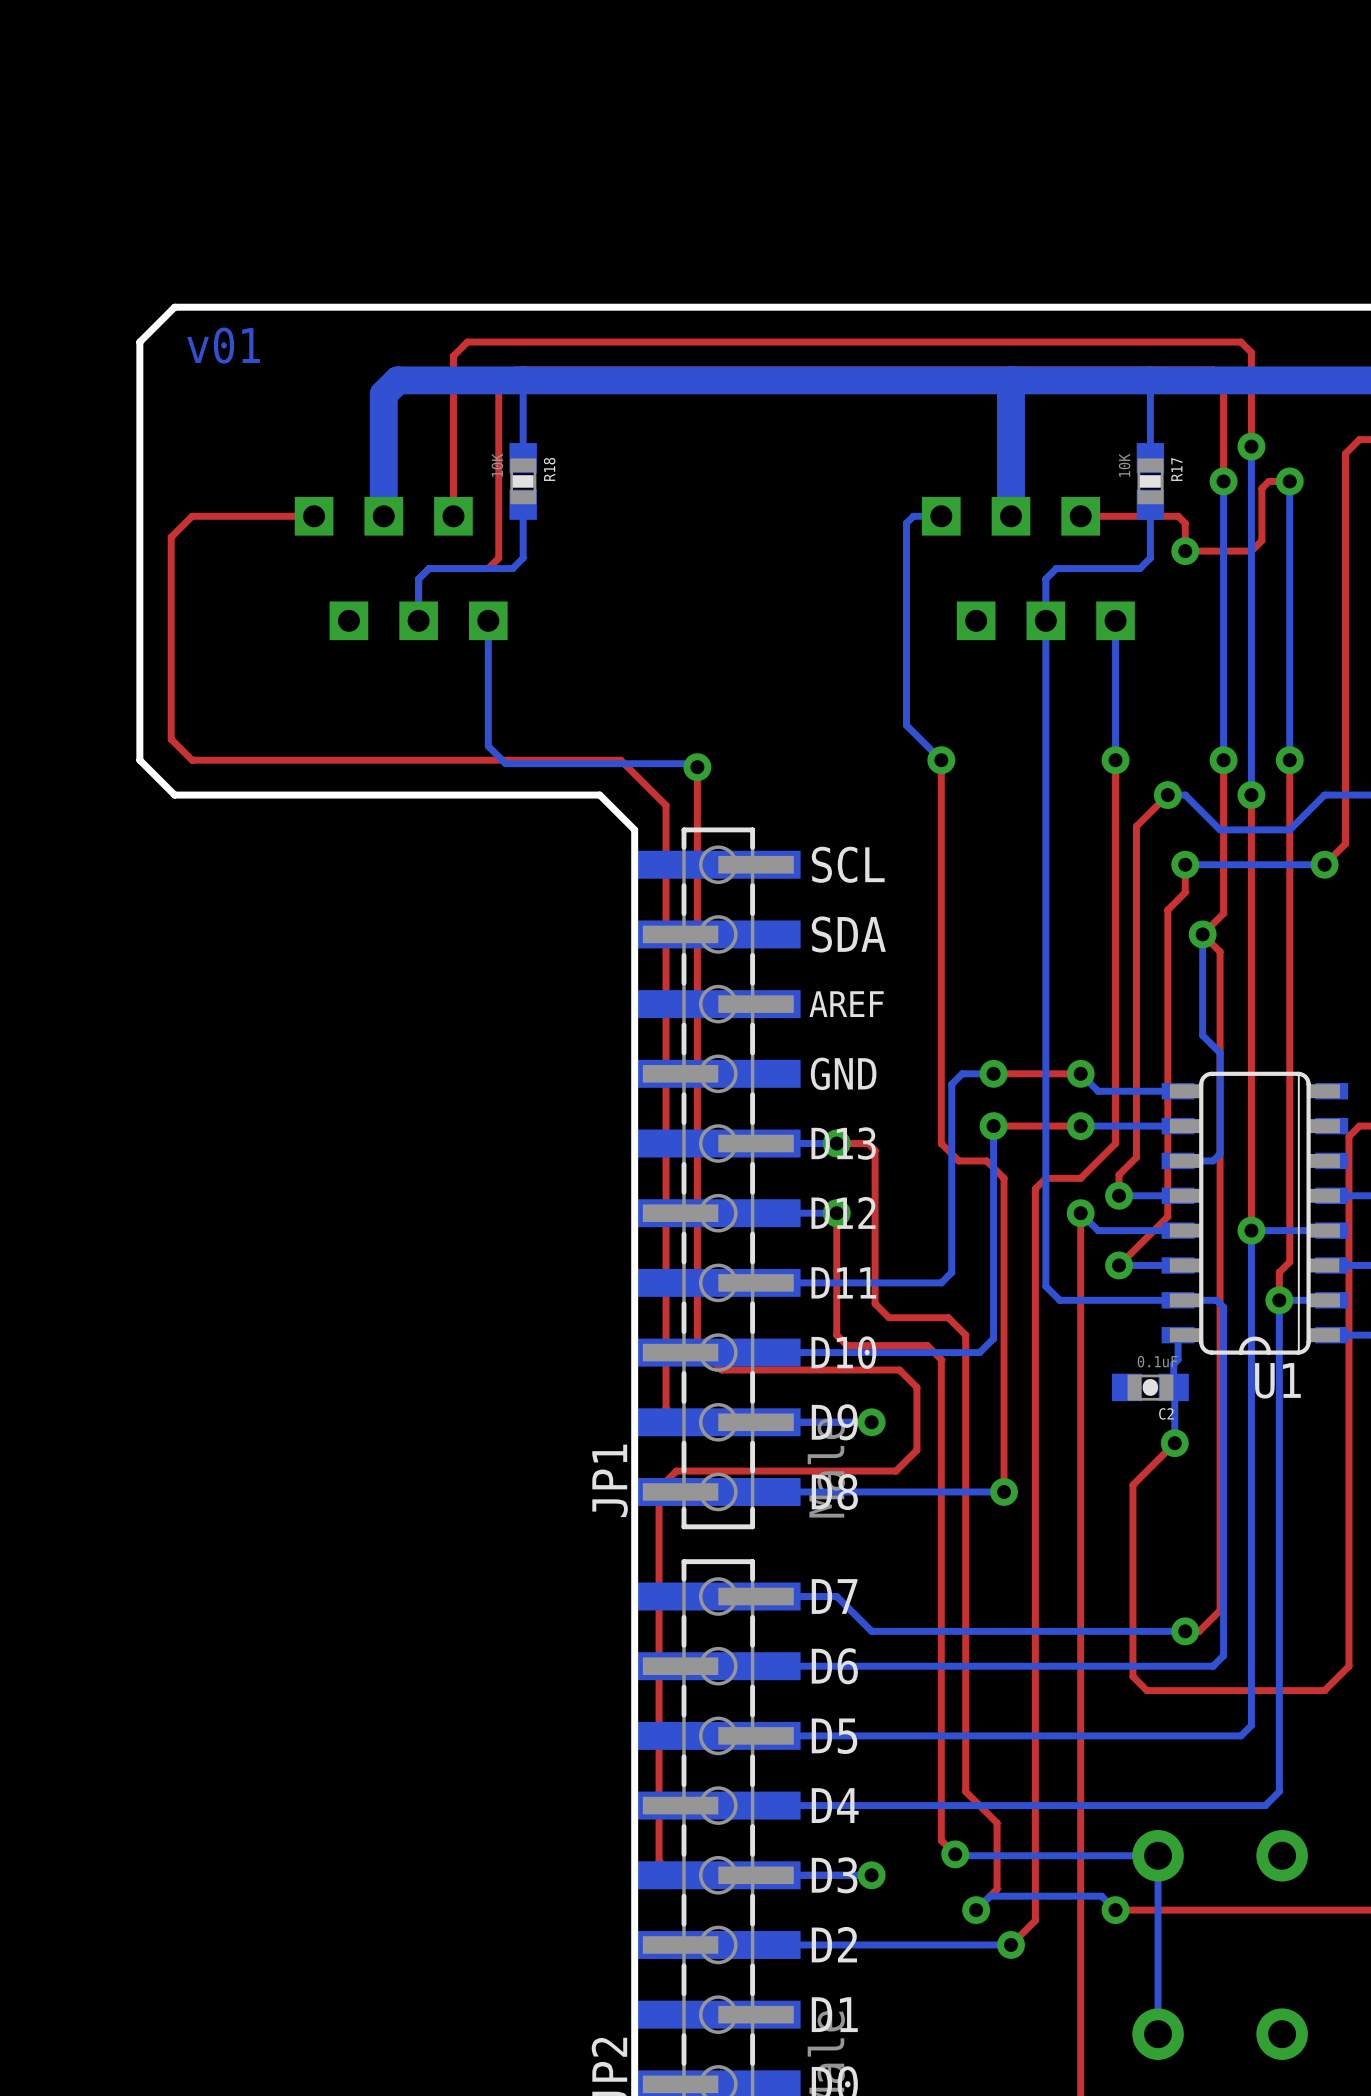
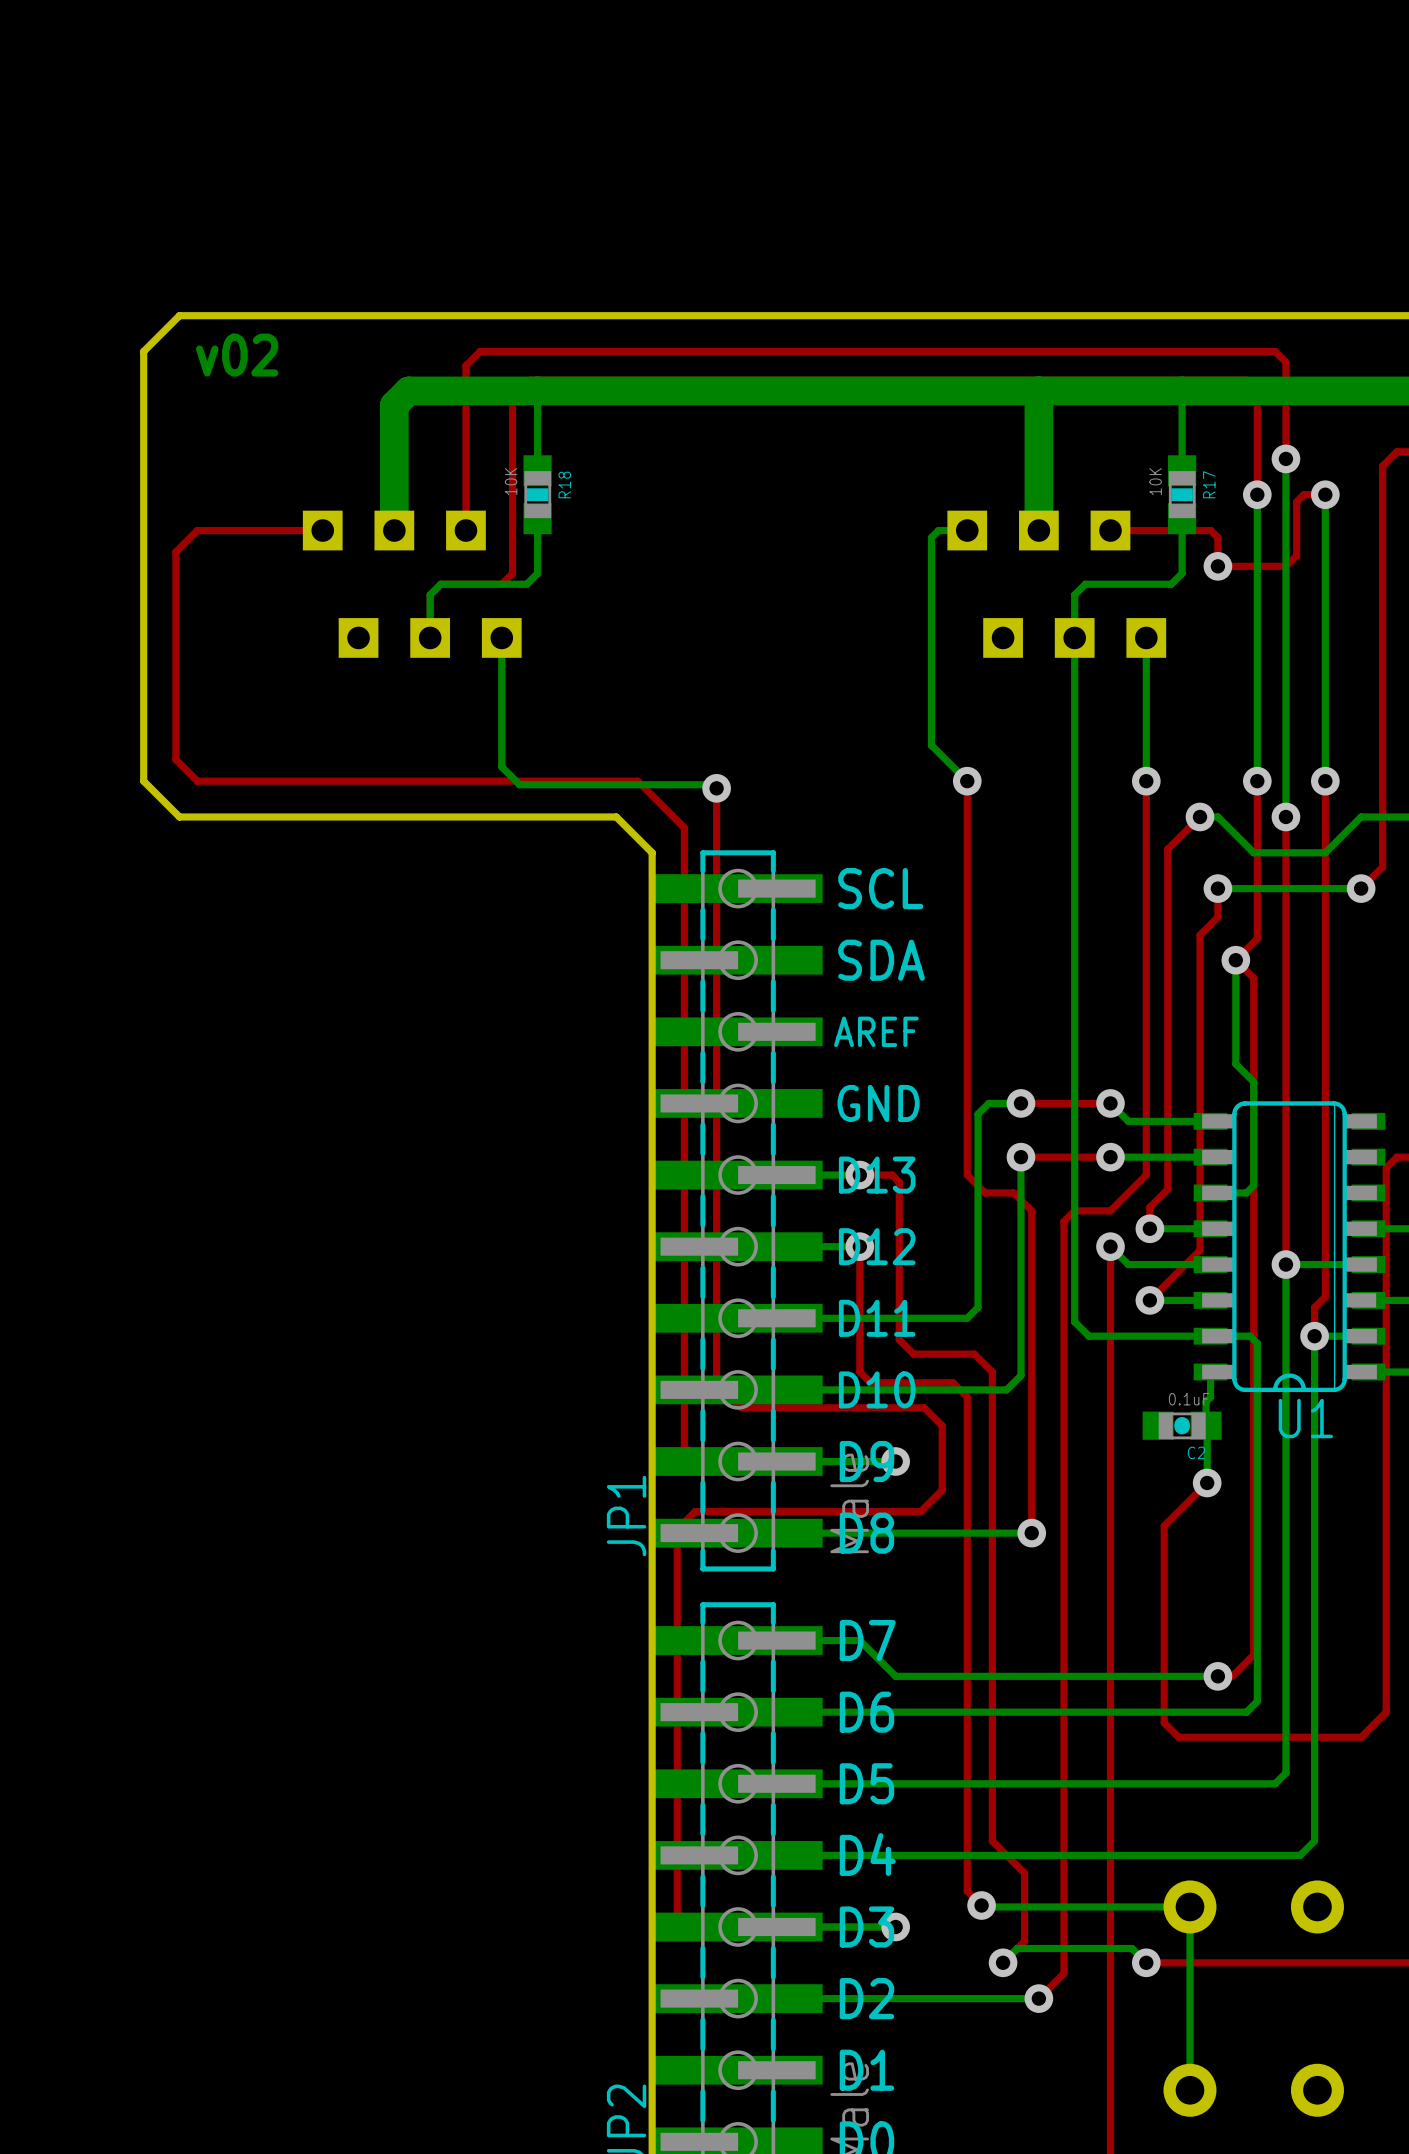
text: v01 (223, 345) -> v02 (237, 355)

